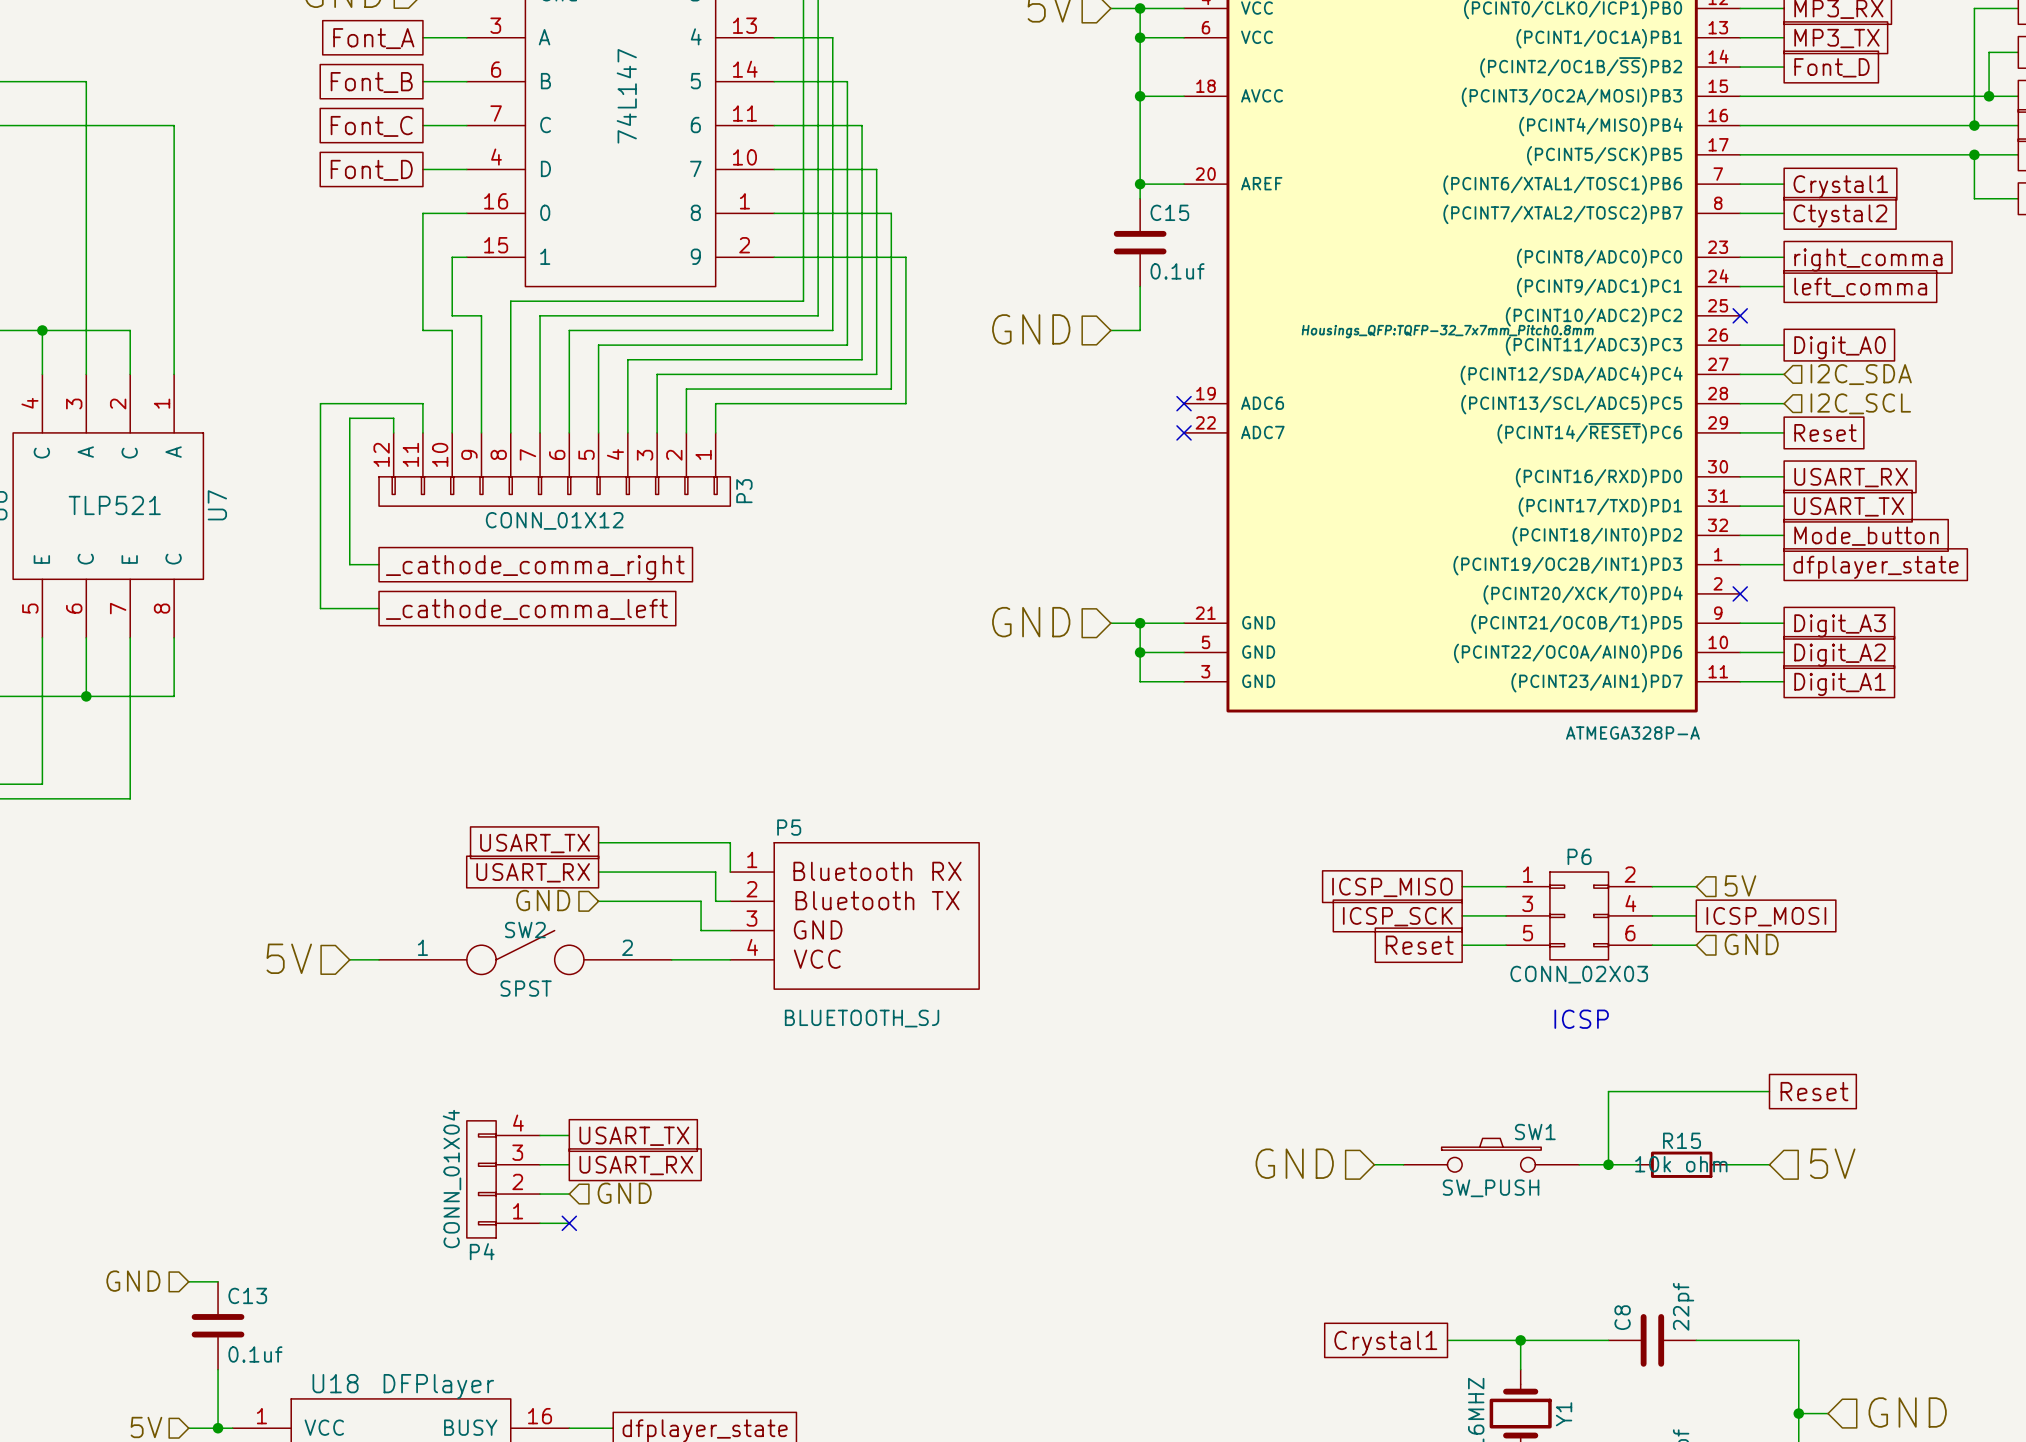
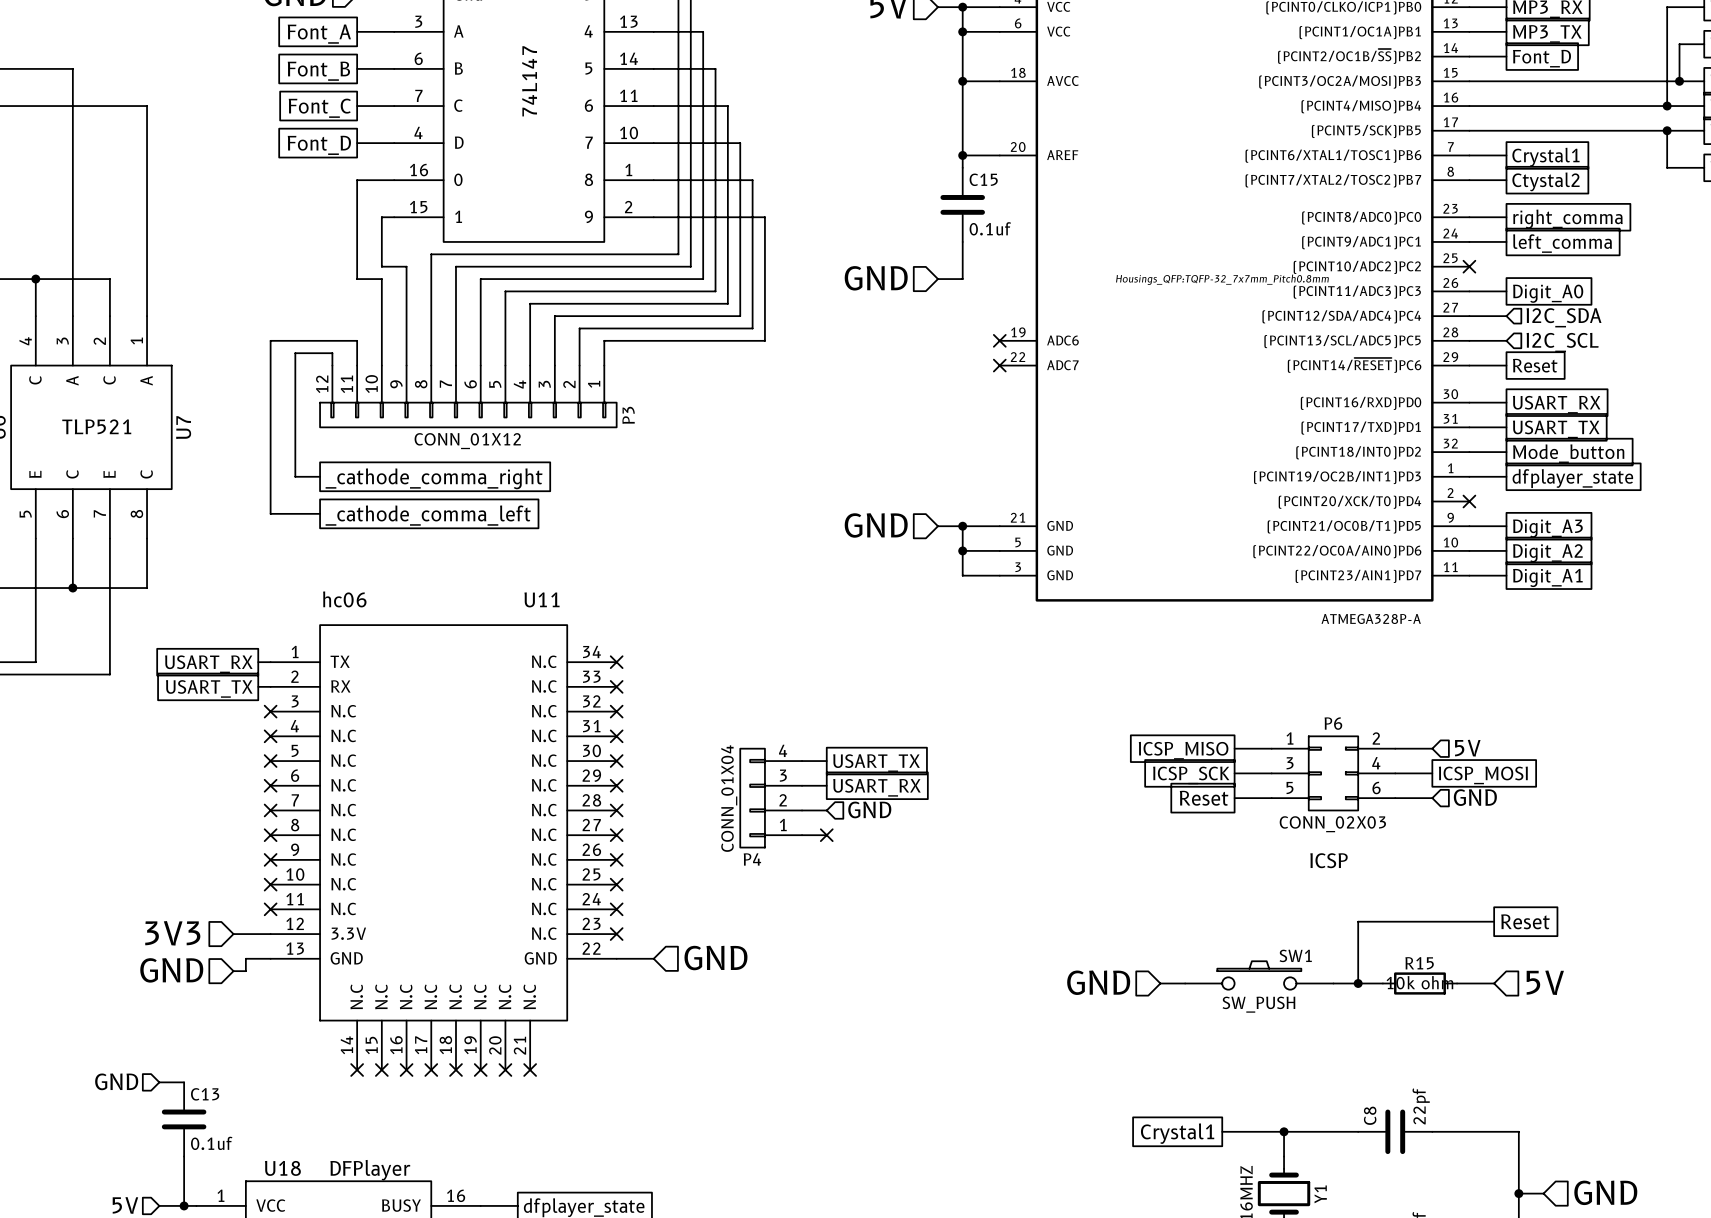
global label: none -> USART_RX (208, 664)
wire: none -> (258, 662) (270, 662)
no-connect mark: none -> (616, 662)
wire: none -> (258, 686) (270, 686)
no-connect mark: none -> (616, 686)
global label: none -> USART_TX (209, 688)
no-connect mark: none -> (270, 711)
wire: (598, 842) (730, 842) (730, 872) -> none
no-connect mark: none -> (616, 711)
global label: USART_TX (535, 843) -> none
no-connect mark: none -> (270, 736)
global label: USART_RX (533, 872) -> none
wire: (598, 872) (715, 872) (715, 901) (730, 901) -> none
no-connect mark: none -> (616, 736)
hierarchical label: GND (543, 900) -> none
no-connect mark: none -> (270, 761)
wire: (598, 901) (701, 901) (701, 930) (730, 930) -> none
no-connect mark: none -> (616, 761)
wire: none -> (802, 761) (826, 761)
global label: none -> USART_TX (876, 763)
P5: BLUETOOTH_SJ (854, 915) -> none
no-connect mark: none -> (270, 785)
no-connect mark: none -> (616, 785)
wire: none -> (802, 785) (826, 785)
global label: none -> USART_RX (876, 787)
SW2: SPST (525, 952) -> none
hierarchical label: 5V (289, 958) -> none
no-connect mark: none -> (270, 810)
no-connect mark: none -> (616, 810)
wire: none -> (802, 810) (826, 810)
hierarchical label: none -> GND (869, 809)
no-connect mark: none -> (270, 835)
no-connect mark: none -> (616, 835)
no-connect mark: none -> (826, 835)
U11: none -> hc06 (443, 847)
no-connect mark: none -> (270, 859)
no-connect mark: none -> (616, 859)
no-connect mark: none -> (270, 884)
no-connect mark: none -> (616, 884)
no-connect mark: none -> (270, 909)
no-connect mark: none -> (616, 909)
hierarchical label: none -> 3V3 (172, 933)
wire: none -> (233, 934) (270, 934)
no-connect mark: none -> (616, 934)
hierarchical label: none -> GND (715, 958)
wire: none -> (270, 958) (245, 958) (245, 971) (233, 971)
wire: (540, 1135) (569, 1135) -> none
wire: none -> (616, 958) (653, 958)
global label: USART_TX (634, 1136) -> none
hierarchical label: none -> GND (171, 970)
wire: (540, 1164) (569, 1164) -> none
global label: USART_RX (636, 1165) -> none
P4 position: (503, 1179) -> (771, 798)
hierarchical label: GND (624, 1193) -> none
wire: (540, 1194) (569, 1194) -> none
wire: (540, 1223) (569, 1223) -> none
no-connect mark: (569, 1223) -> none
no-connect mark: none -> (357, 1070)
no-connect mark: none -> (381, 1070)
no-connect mark: none -> (406, 1070)
no-connect mark: none -> (431, 1070)
no-connect mark: none -> (455, 1070)
no-connect mark: none -> (480, 1070)
no-connect mark: none -> (505, 1070)
no-connect mark: none -> (530, 1070)

